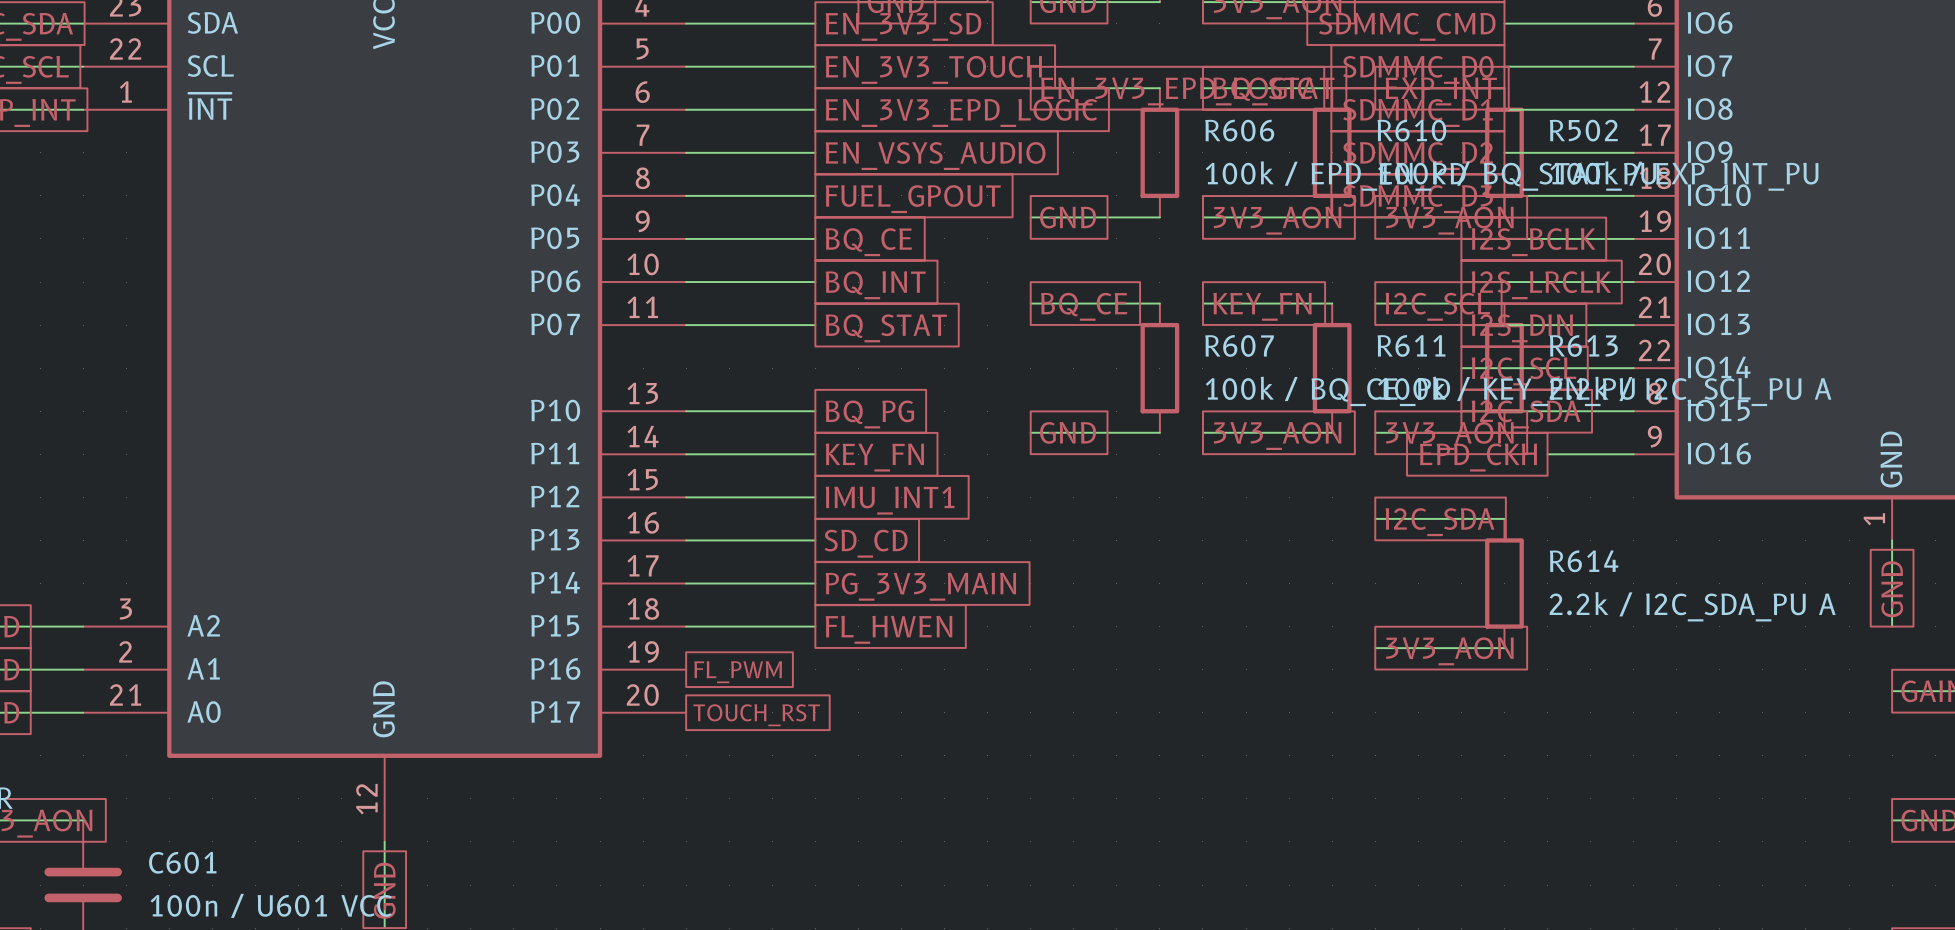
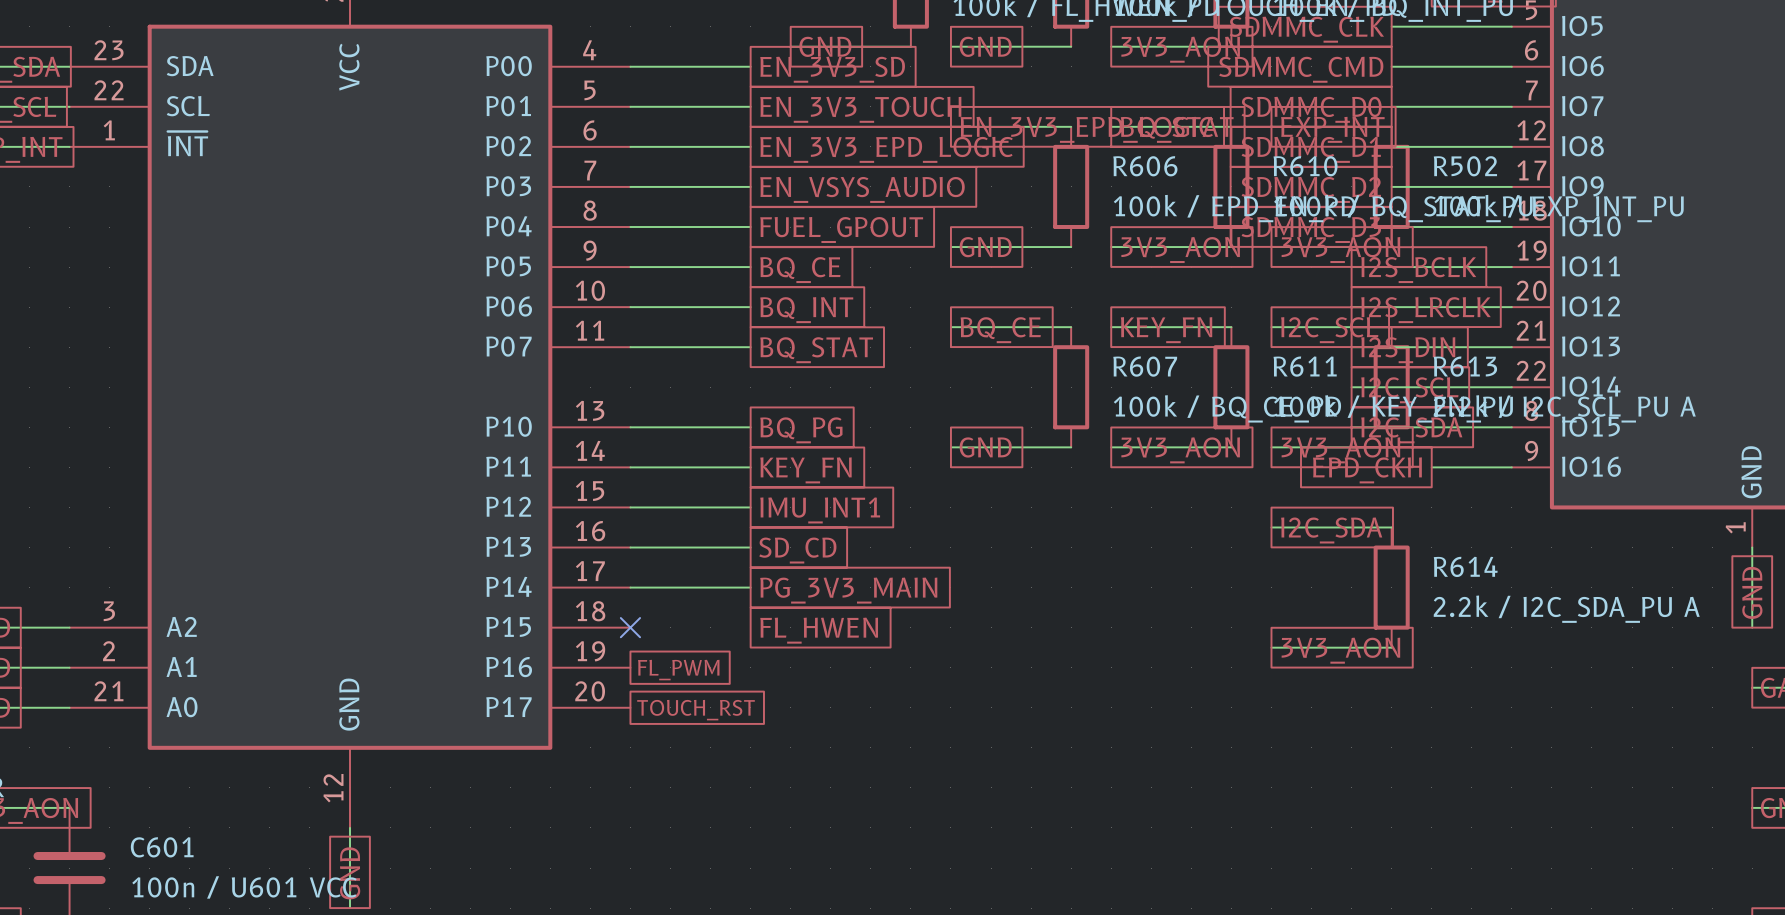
wire: (686, 626) (815, 626) -> none
no-connect mark: none -> (630, 627)

